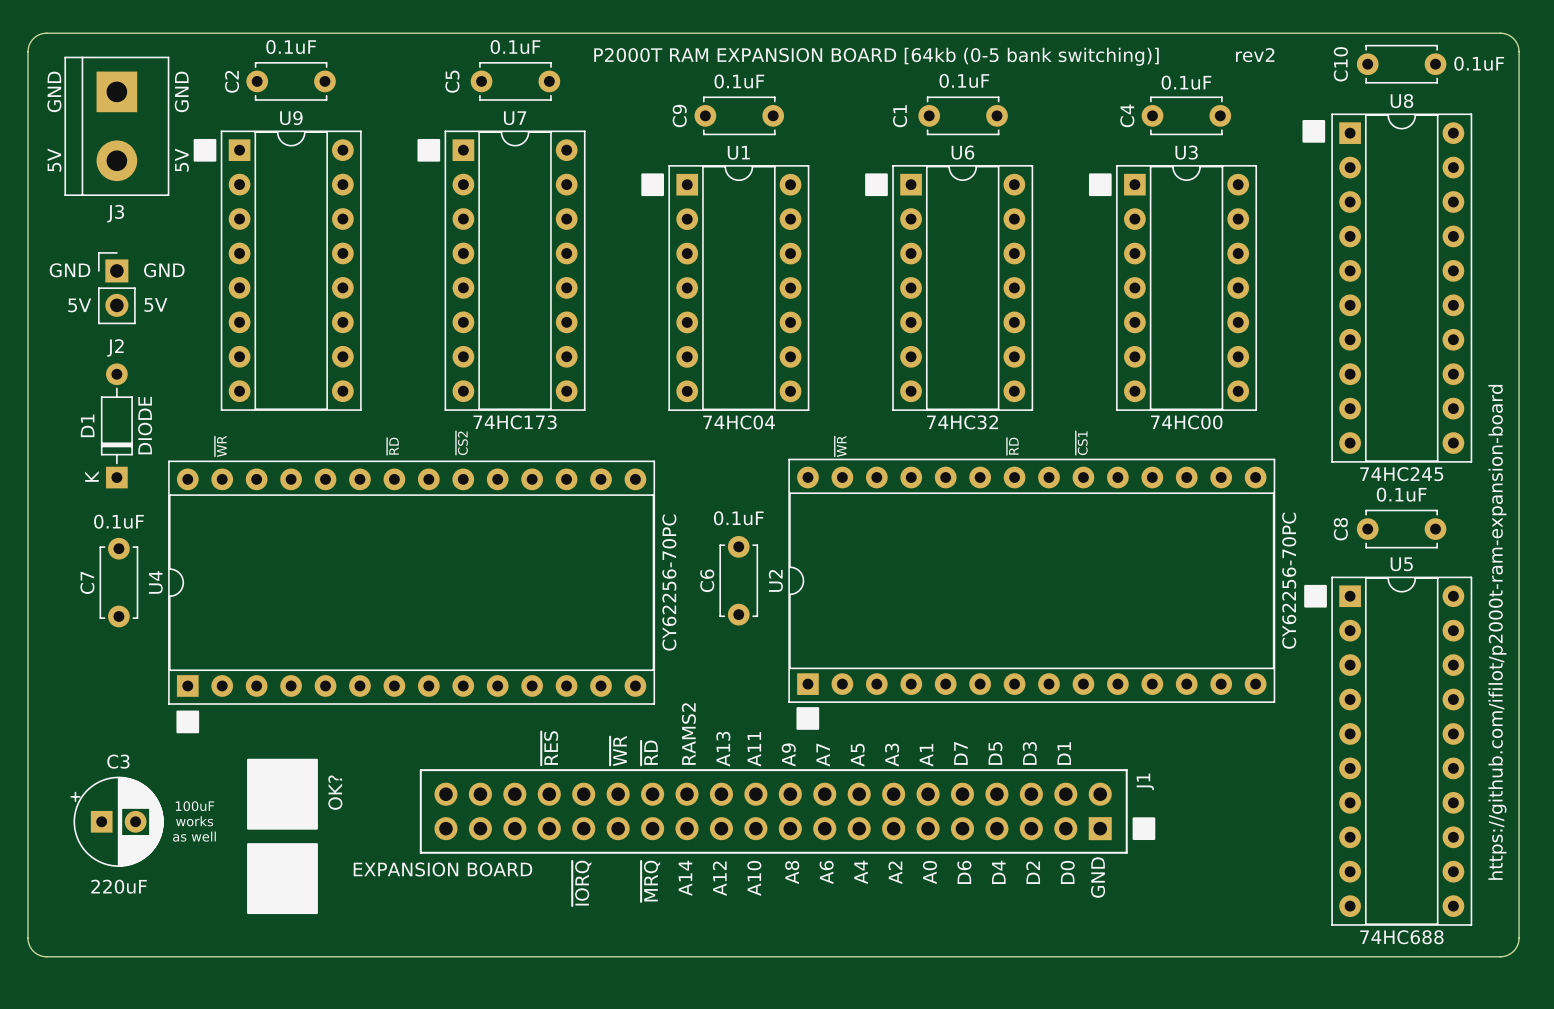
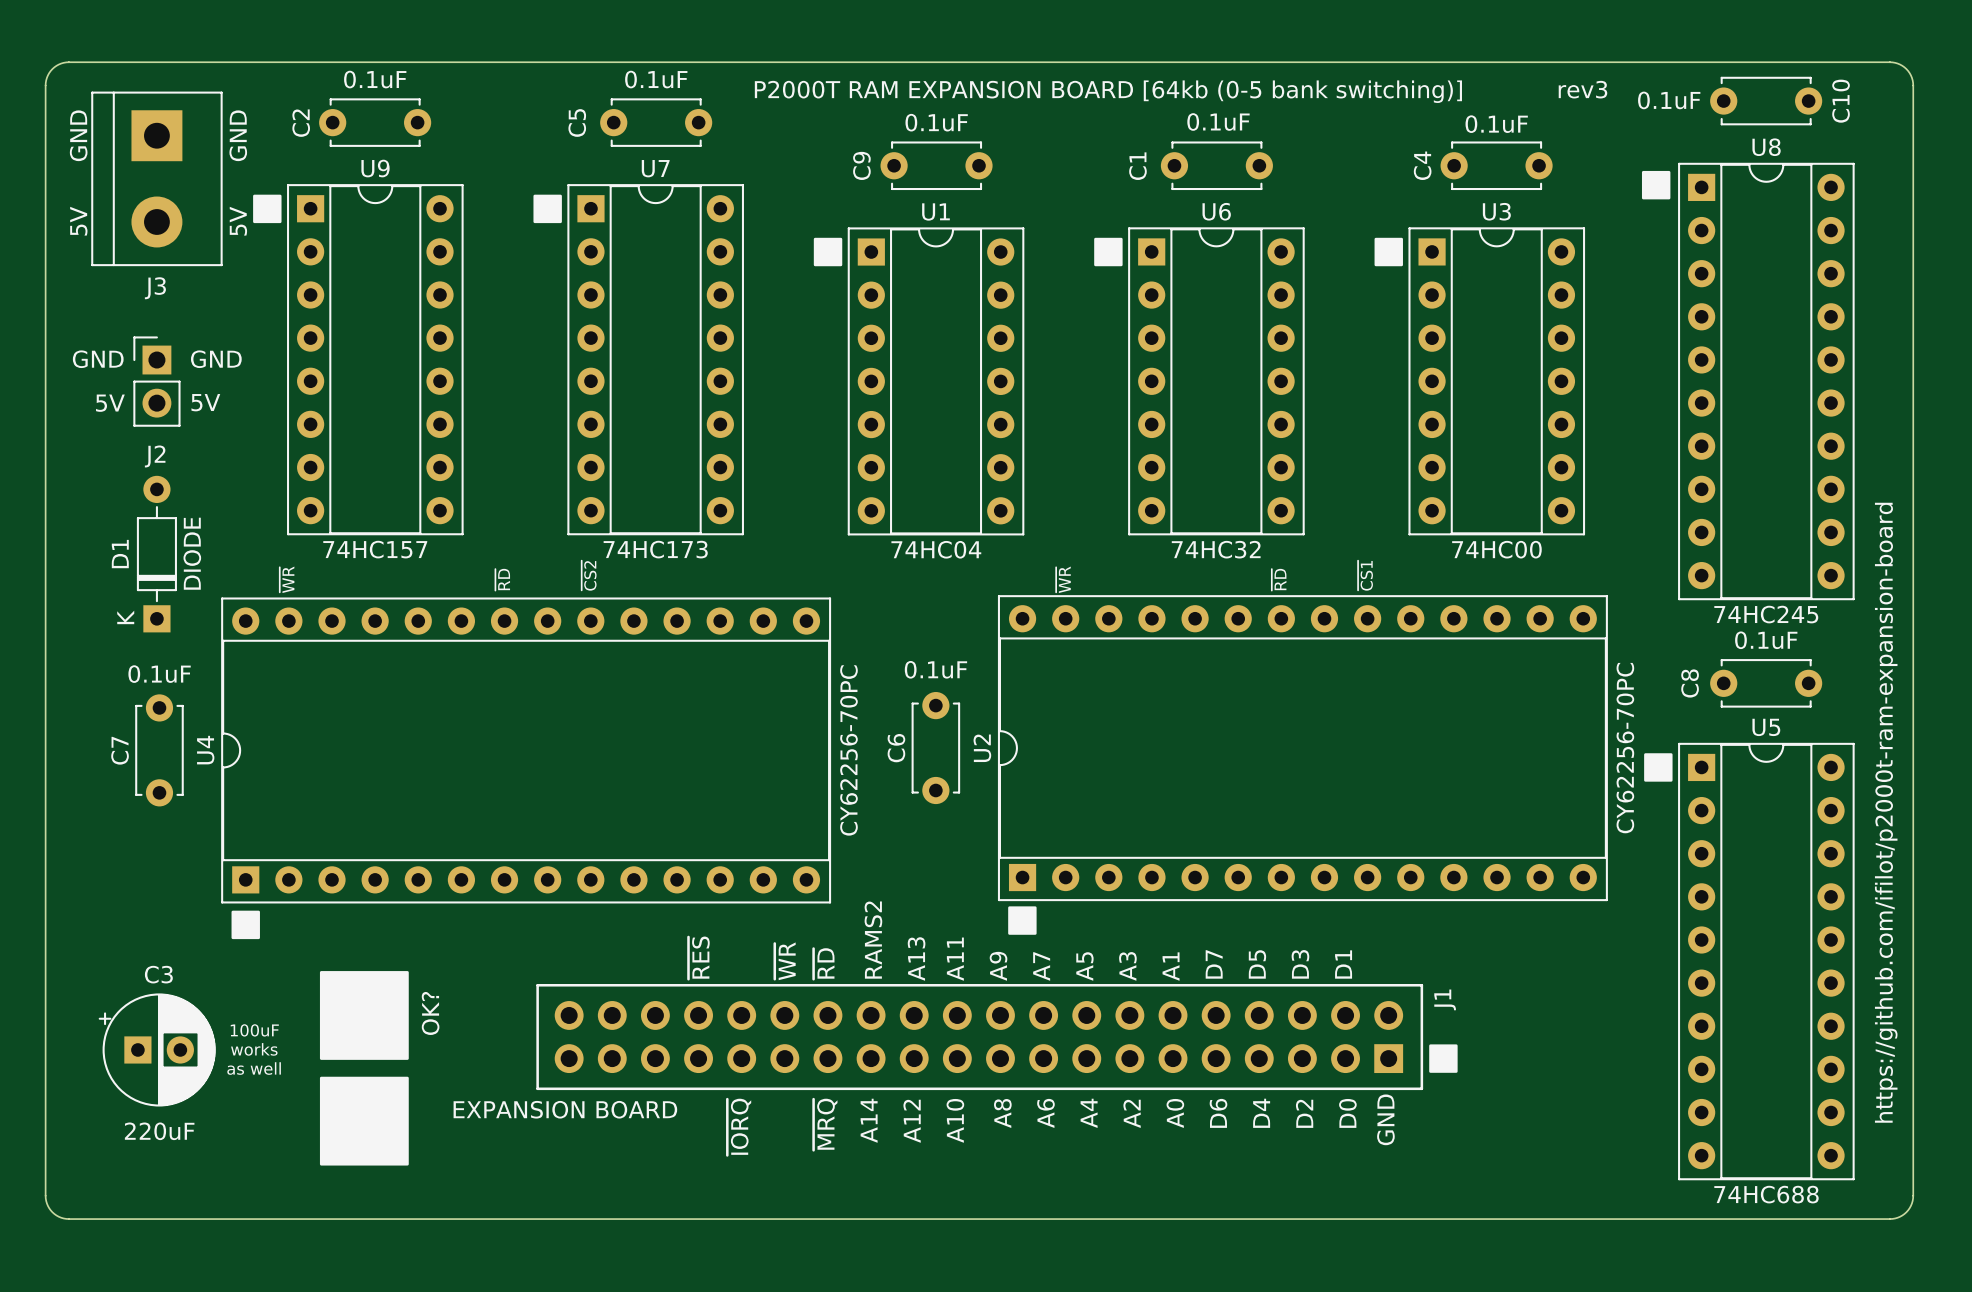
text: rev2 (1255, 55) -> rev3 (1582, 89)
C10 value position: 0.1uF (1479, 63) -> 0.1uF (1669, 100)
C10 name position: C10 (1340, 64) -> C10 (1841, 101)
U9 value: none -> 74HC157 (375, 549)

